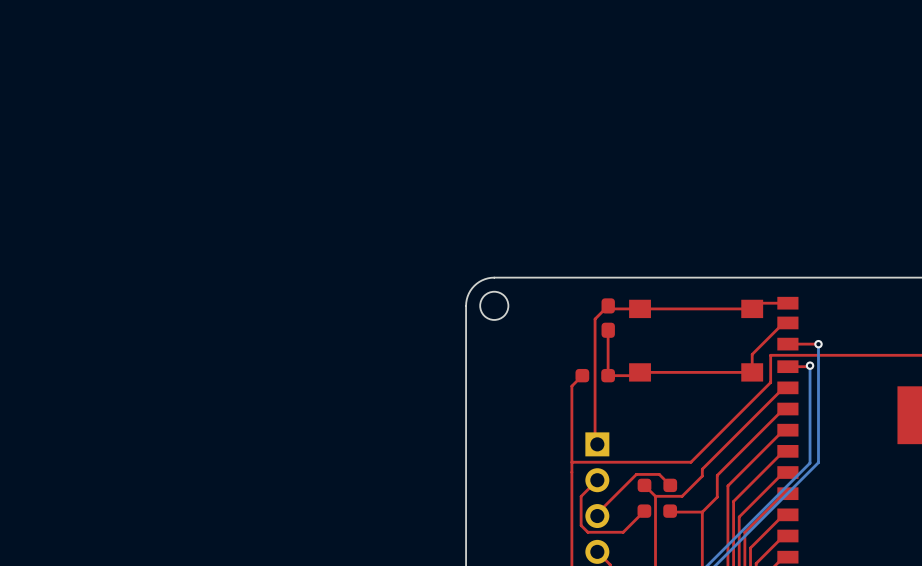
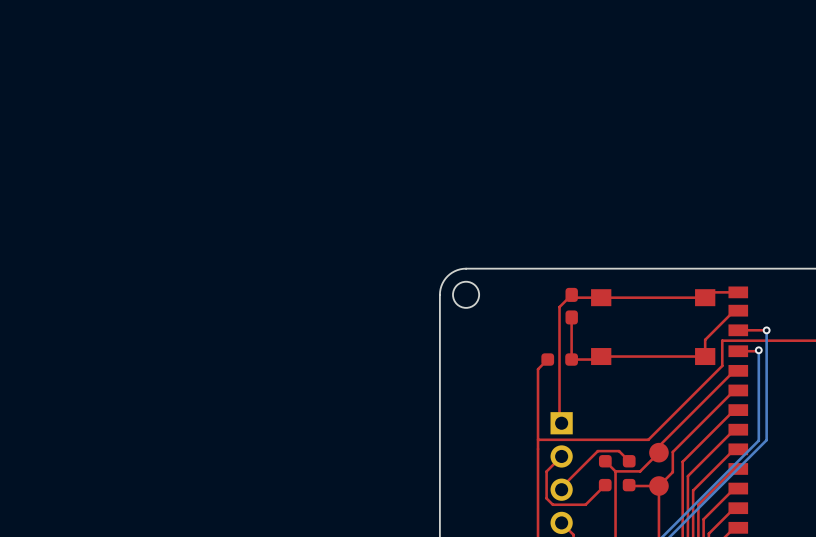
part: none -> (658, 452)
part: none -> (658, 486)

